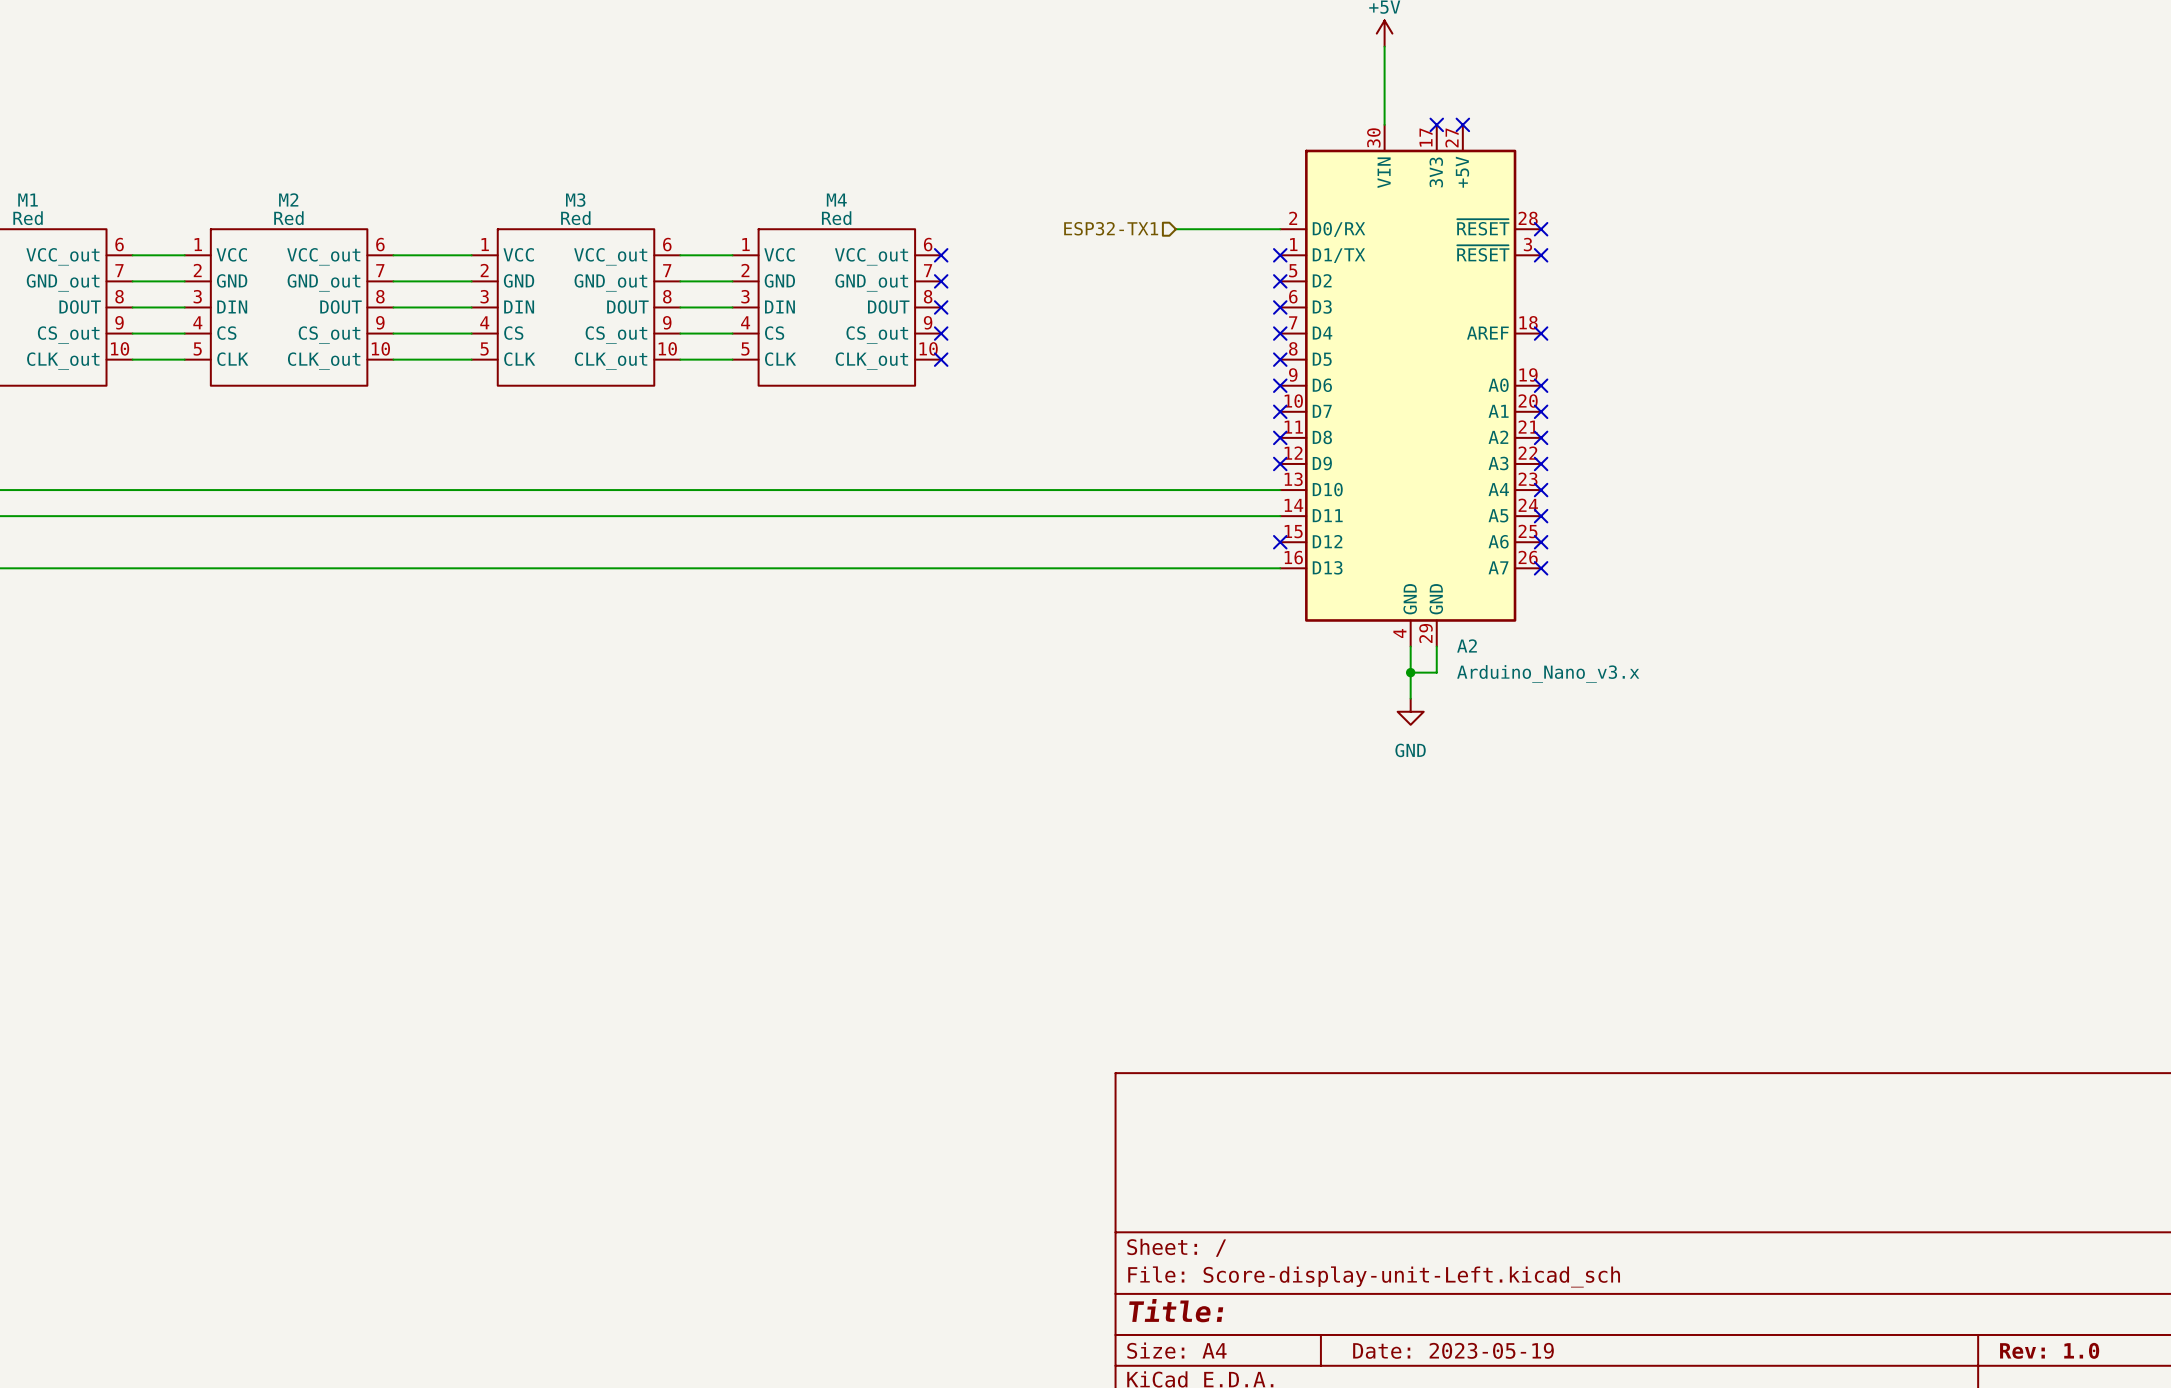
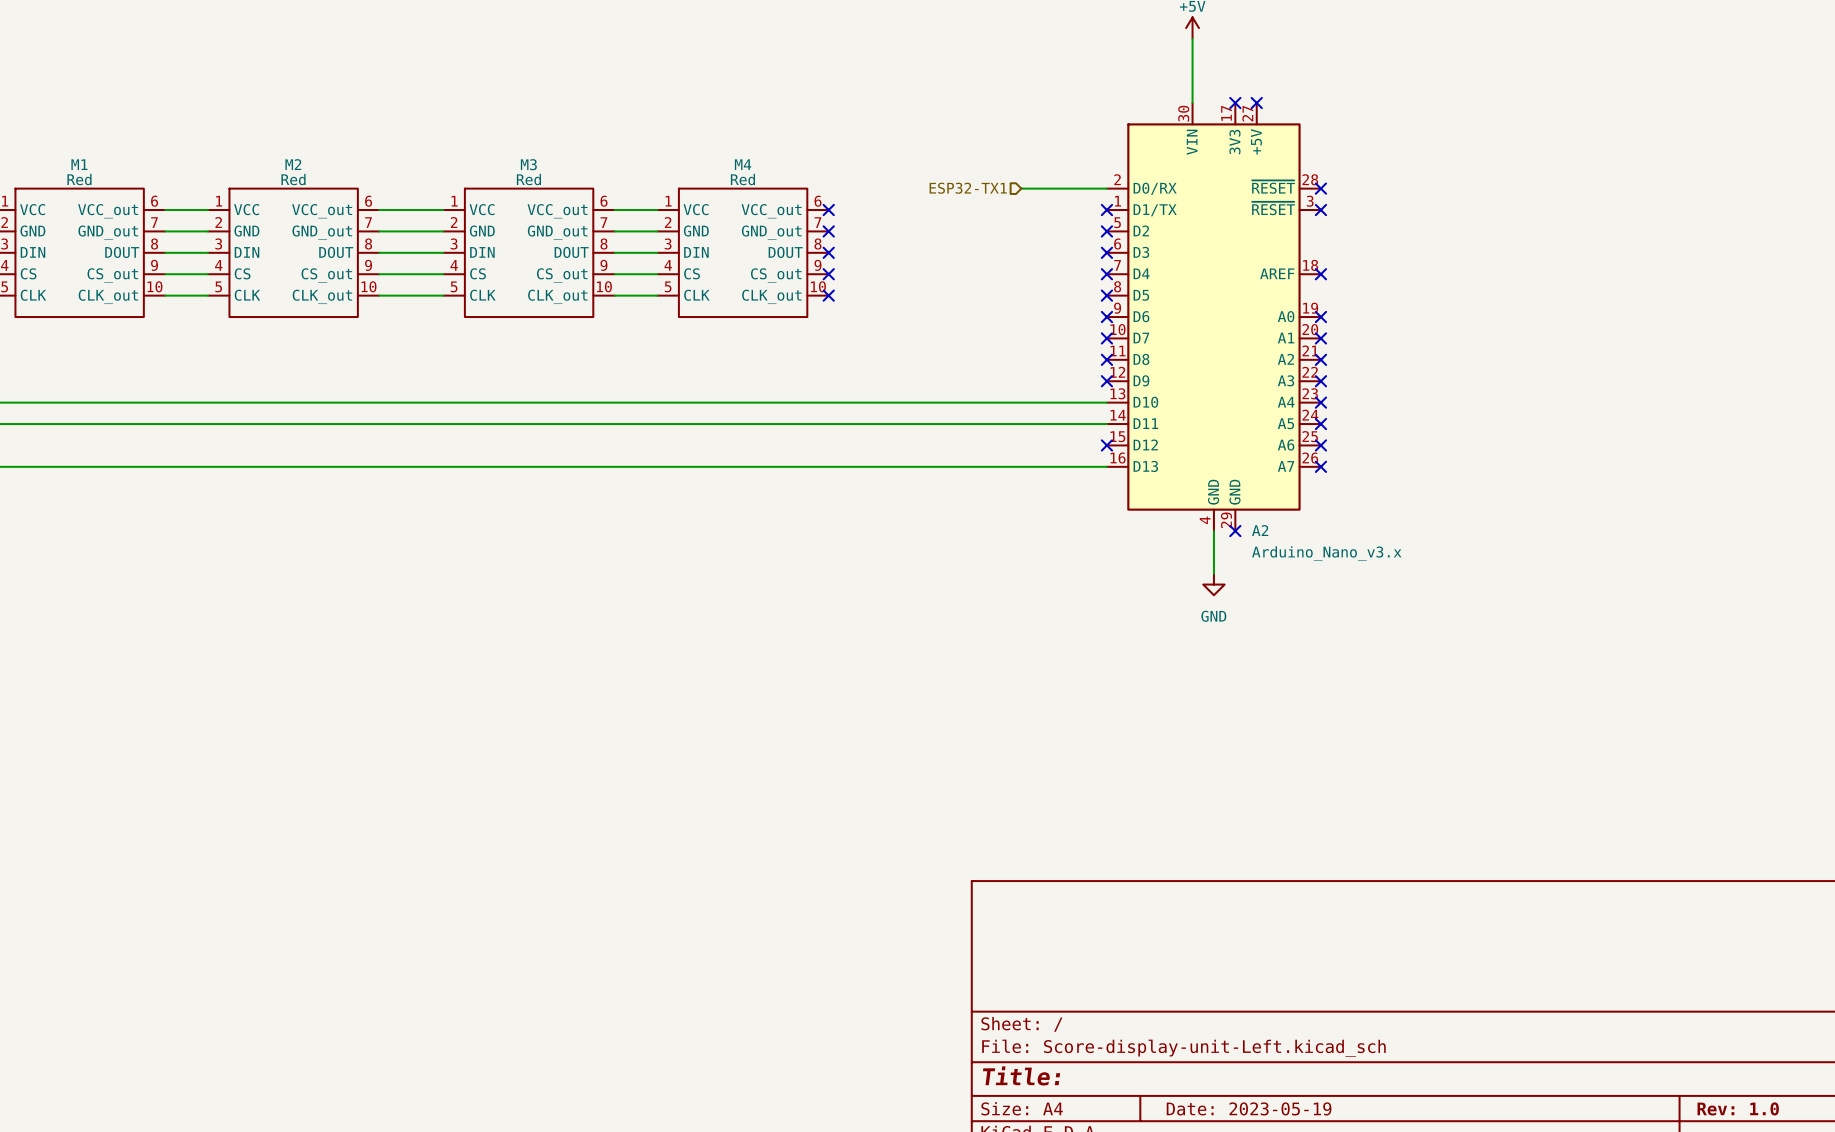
wire: (1436, 646) (1436, 672) (1410, 672) -> none
no-connect mark: none -> (1235, 531)
junction: (1410, 672) -> none

